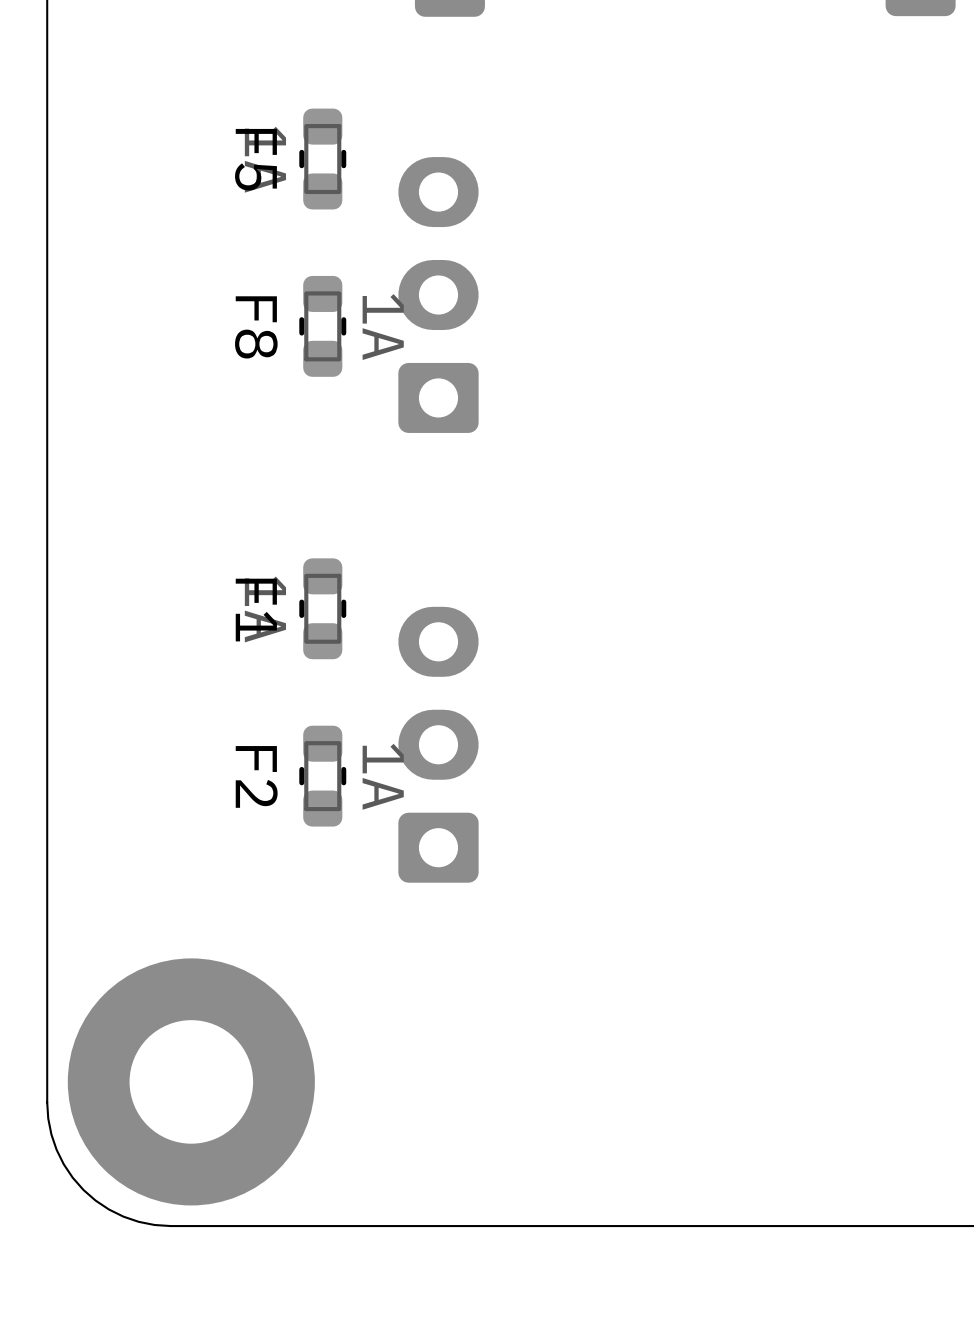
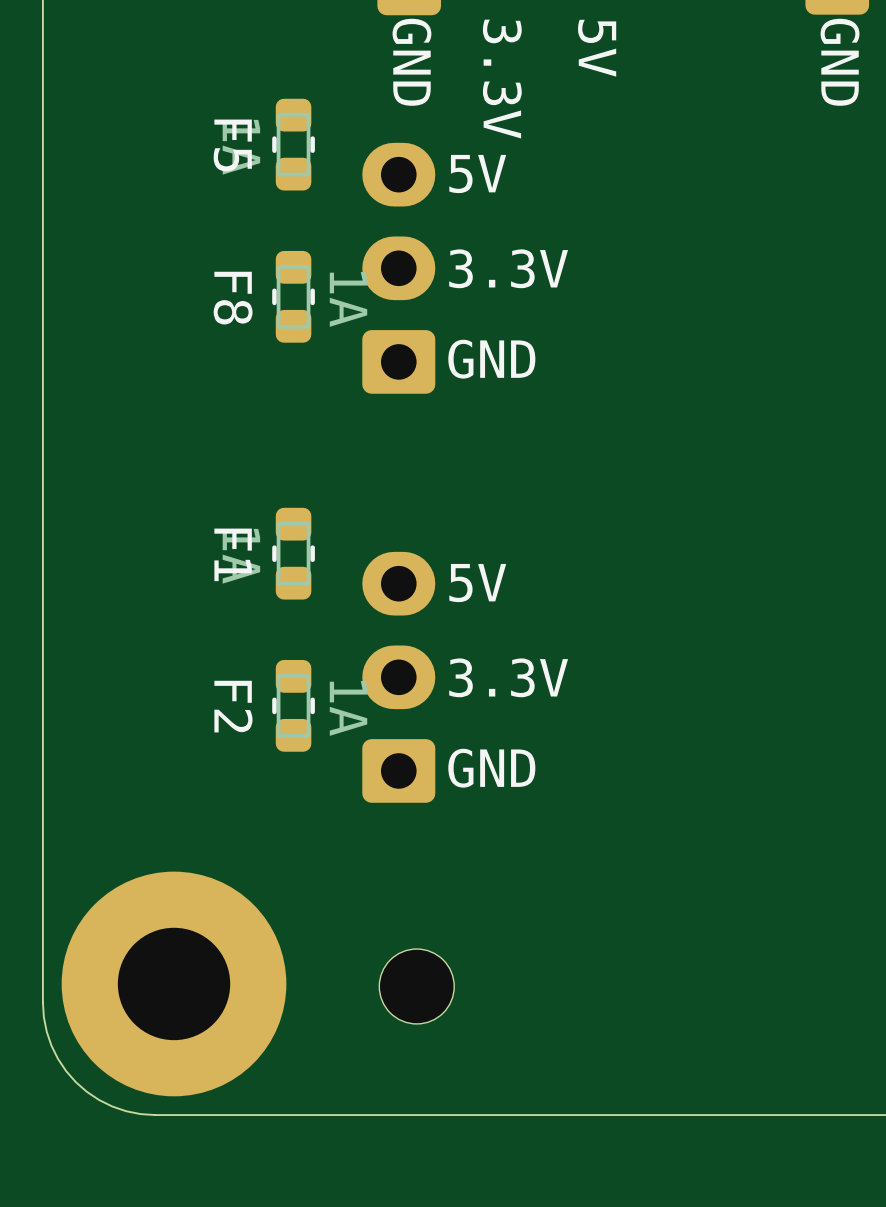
text: none -> 5V (597, 48)
text: none -> GND (411, 62)
text: none -> GND (840, 62)
text: none -> 3.3V (502, 79)
text: none -> 5V (477, 174)
text: none -> 3.3V (508, 268)
text: none -> GND (491, 359)
text: none -> 5V (477, 583)
text: none -> 3.3V (508, 677)
text: none -> GND (491, 768)
part: none -> (416, 986)

